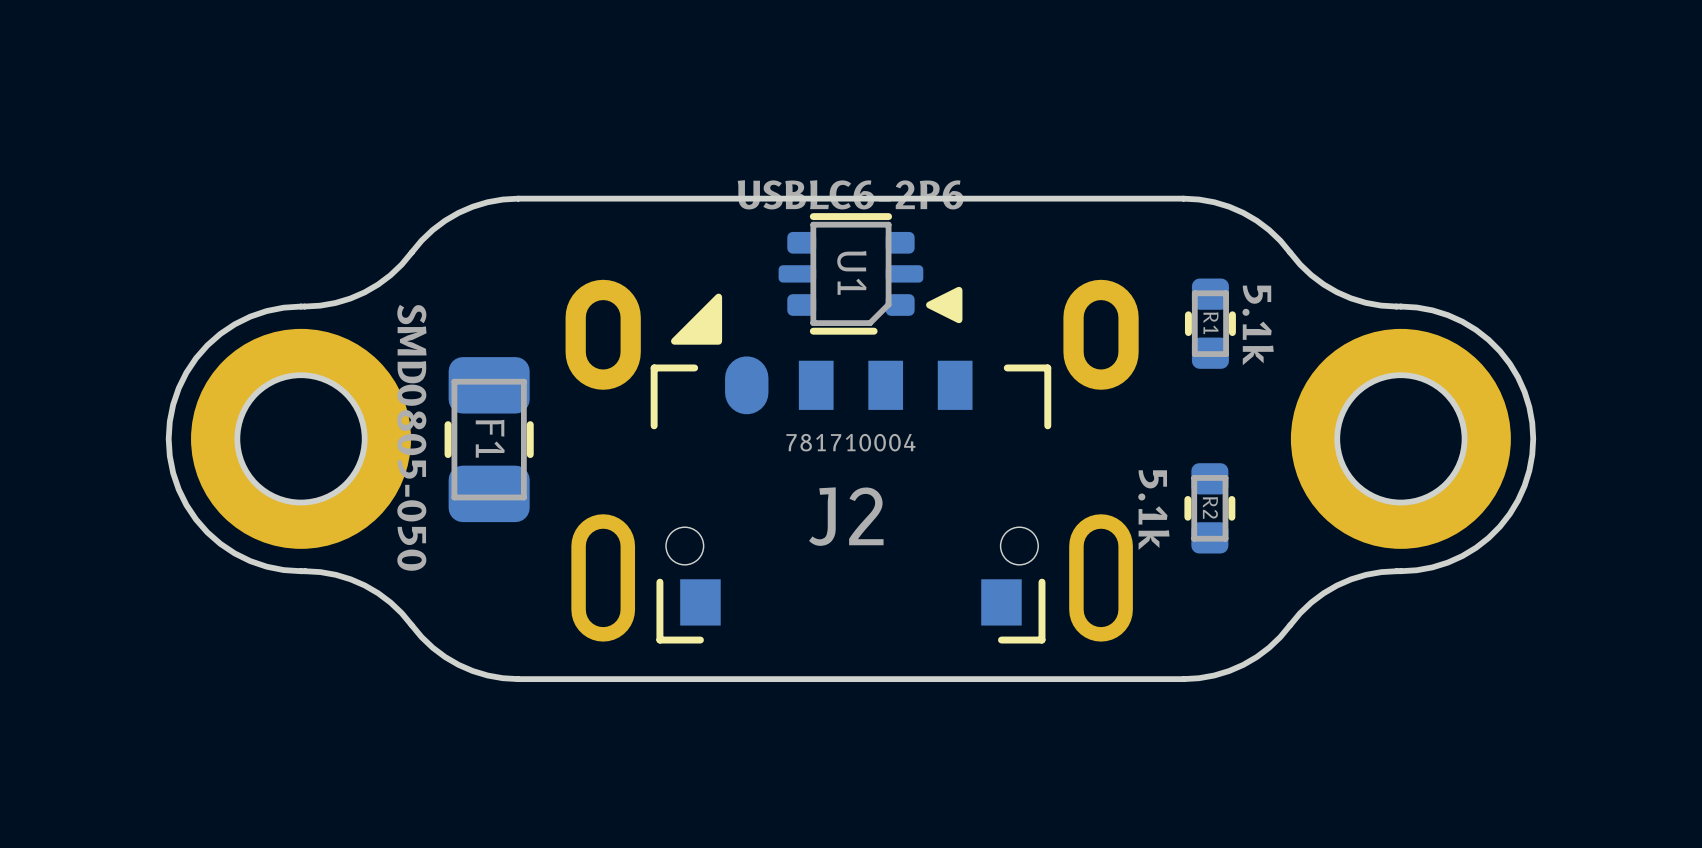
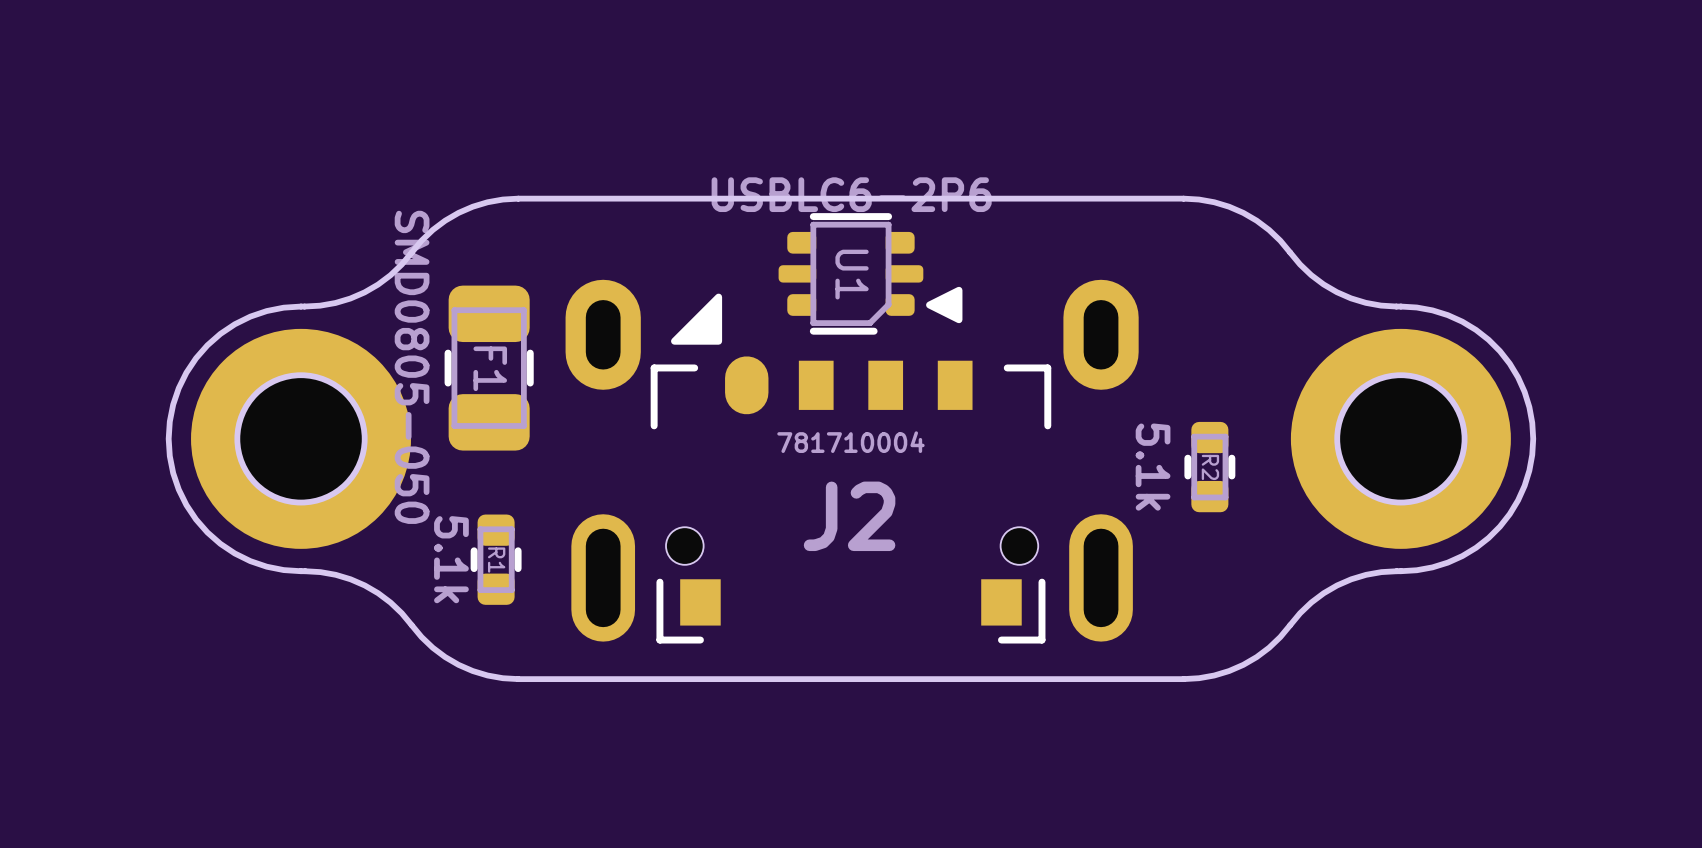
R1 position: (1210, 323) -> (496, 559)
R1 value position: 5.1k (1258, 325) -> 5.1k (451, 559)
F1 position: (489, 439) -> (489, 368)
R2 position: (1209, 508) -> (1209, 467)

